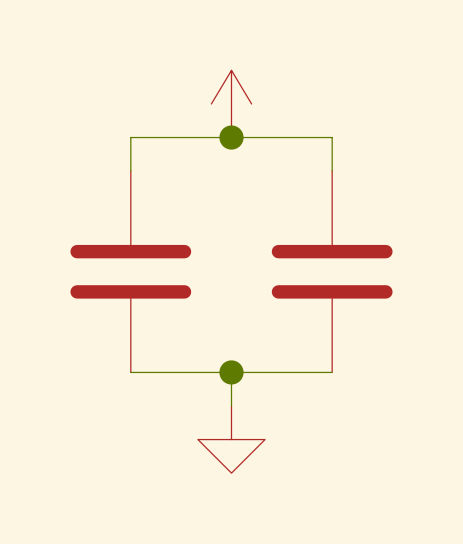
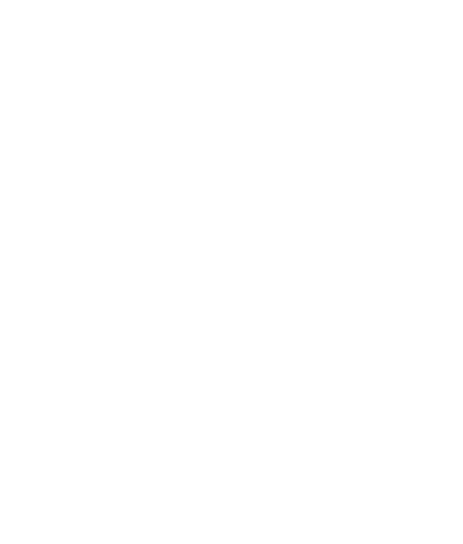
power symbol: (231, 103) -> none
junction: (231, 137) -> none
wire: (130, 171) (130, 137) (332, 137) (332, 171) -> none
part: (130, 271) -> none
part: (332, 271) -> none
wire: (130, 372) (332, 372) -> none
wire: (231, 372) (231, 405) -> none
junction: (231, 372) -> none
power symbol: (231, 439) -> none

